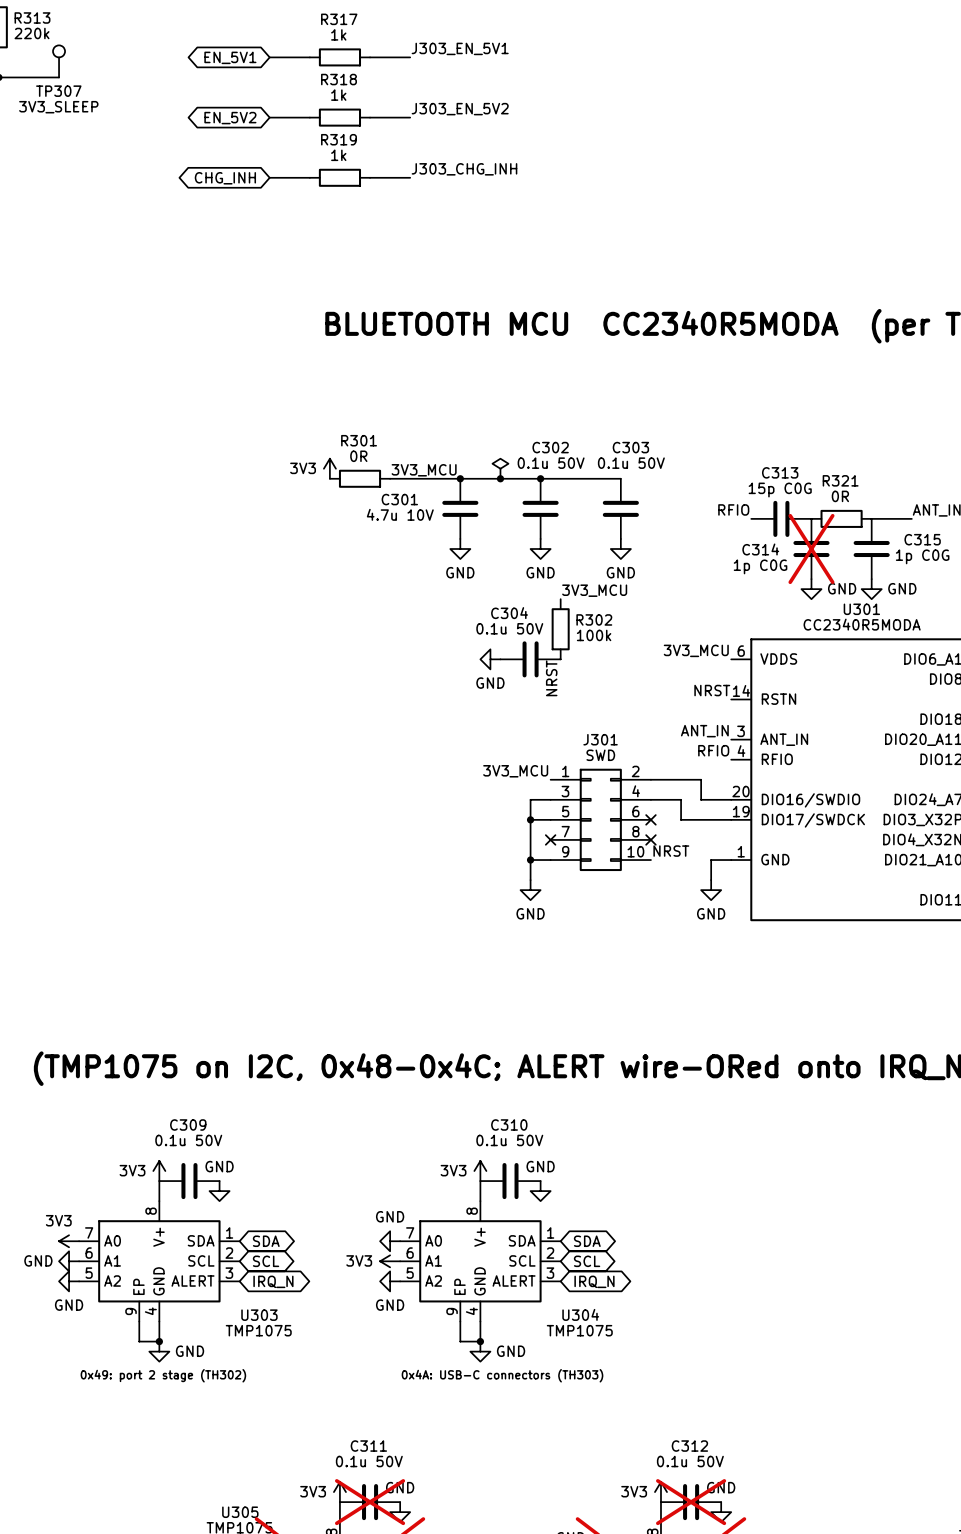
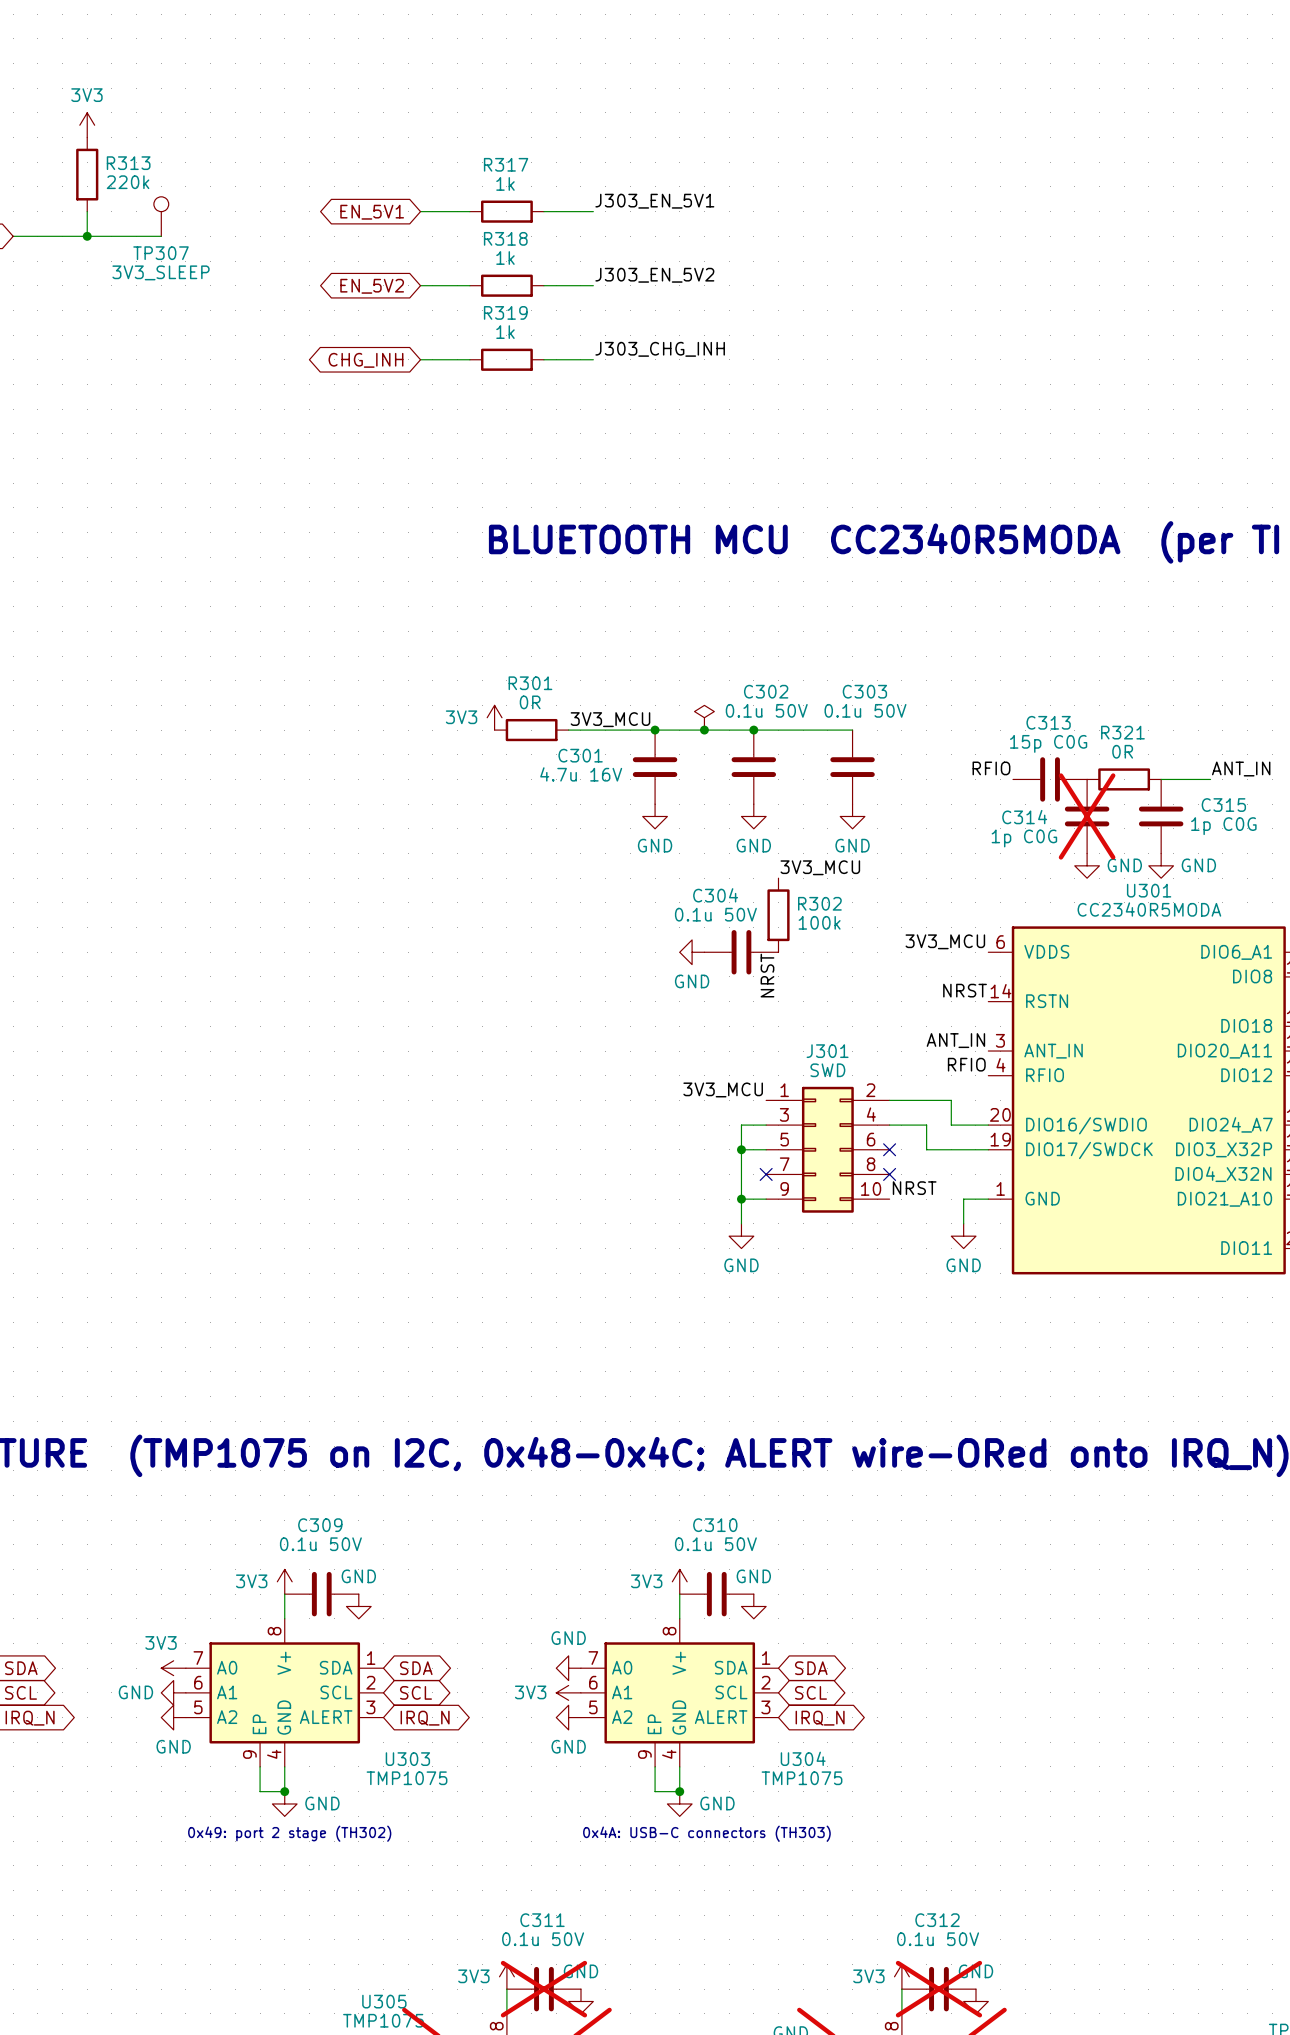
C301 value: 4.7u 10V (400, 514) -> 4.7u 16V (581, 774)

